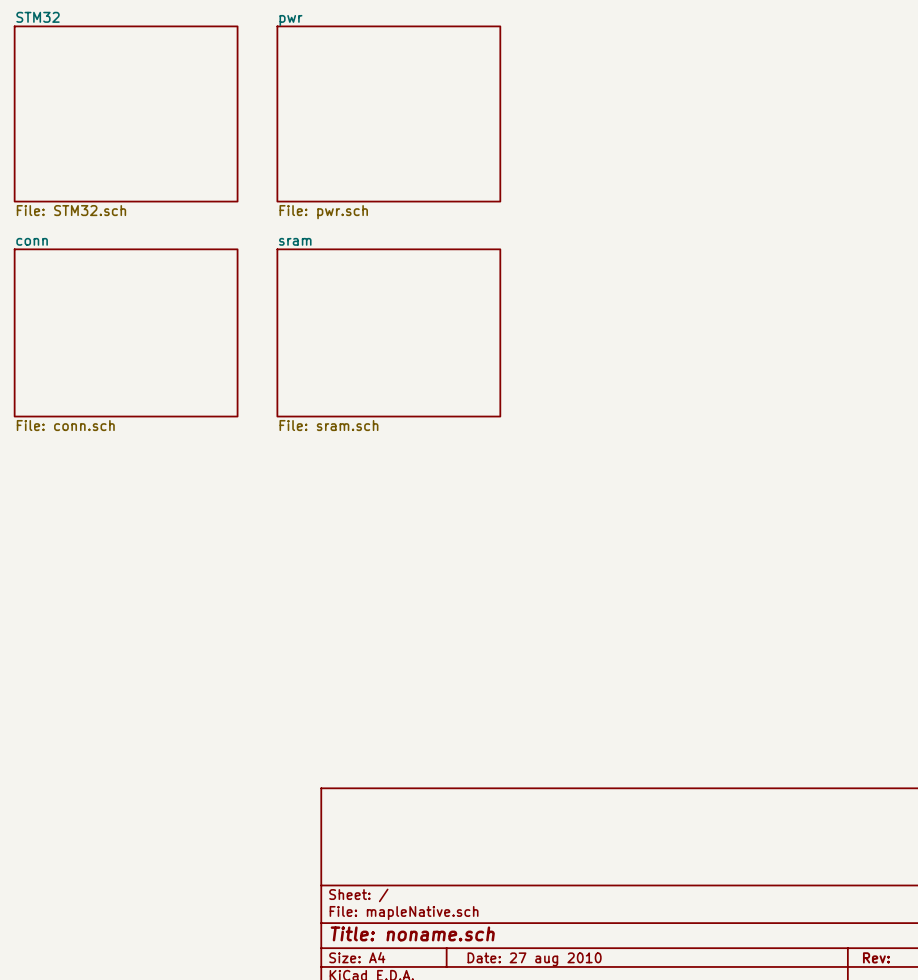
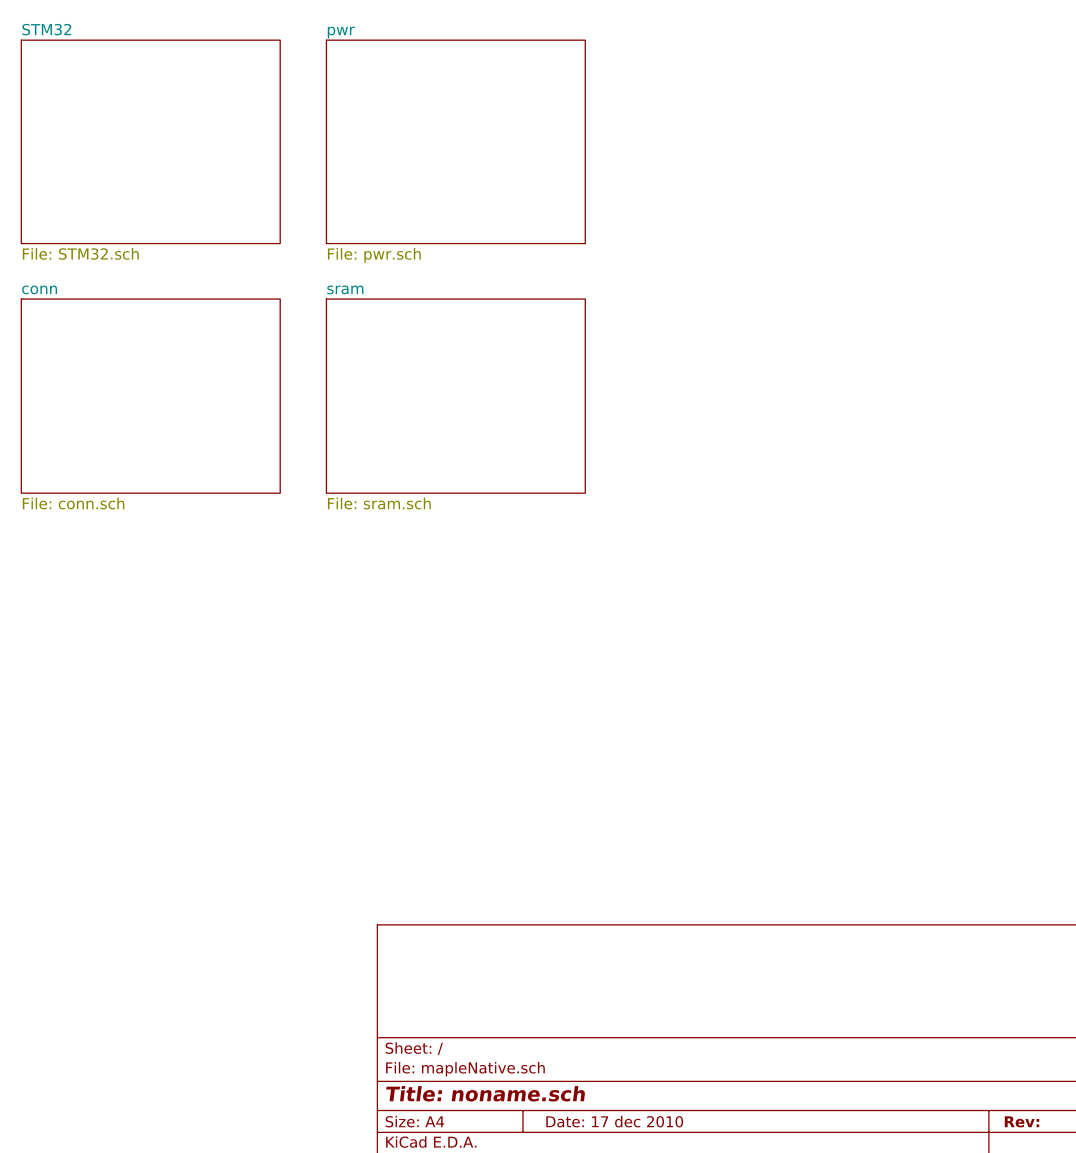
title block: Date: 27 aug 2010 (534, 959) -> Date: 17 dec 2010 (614, 1121)

